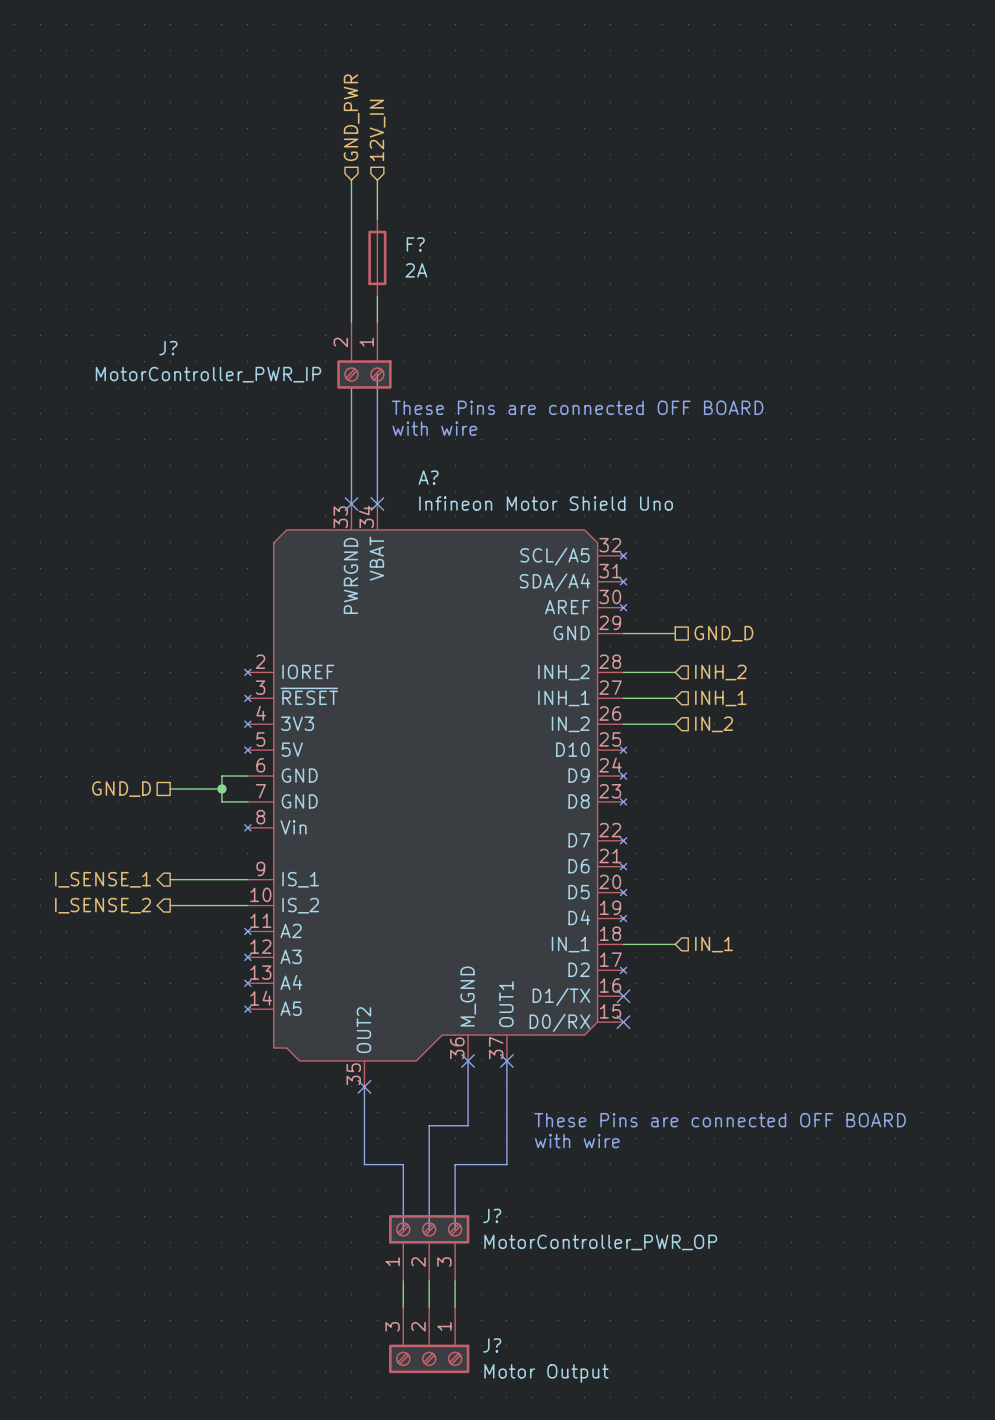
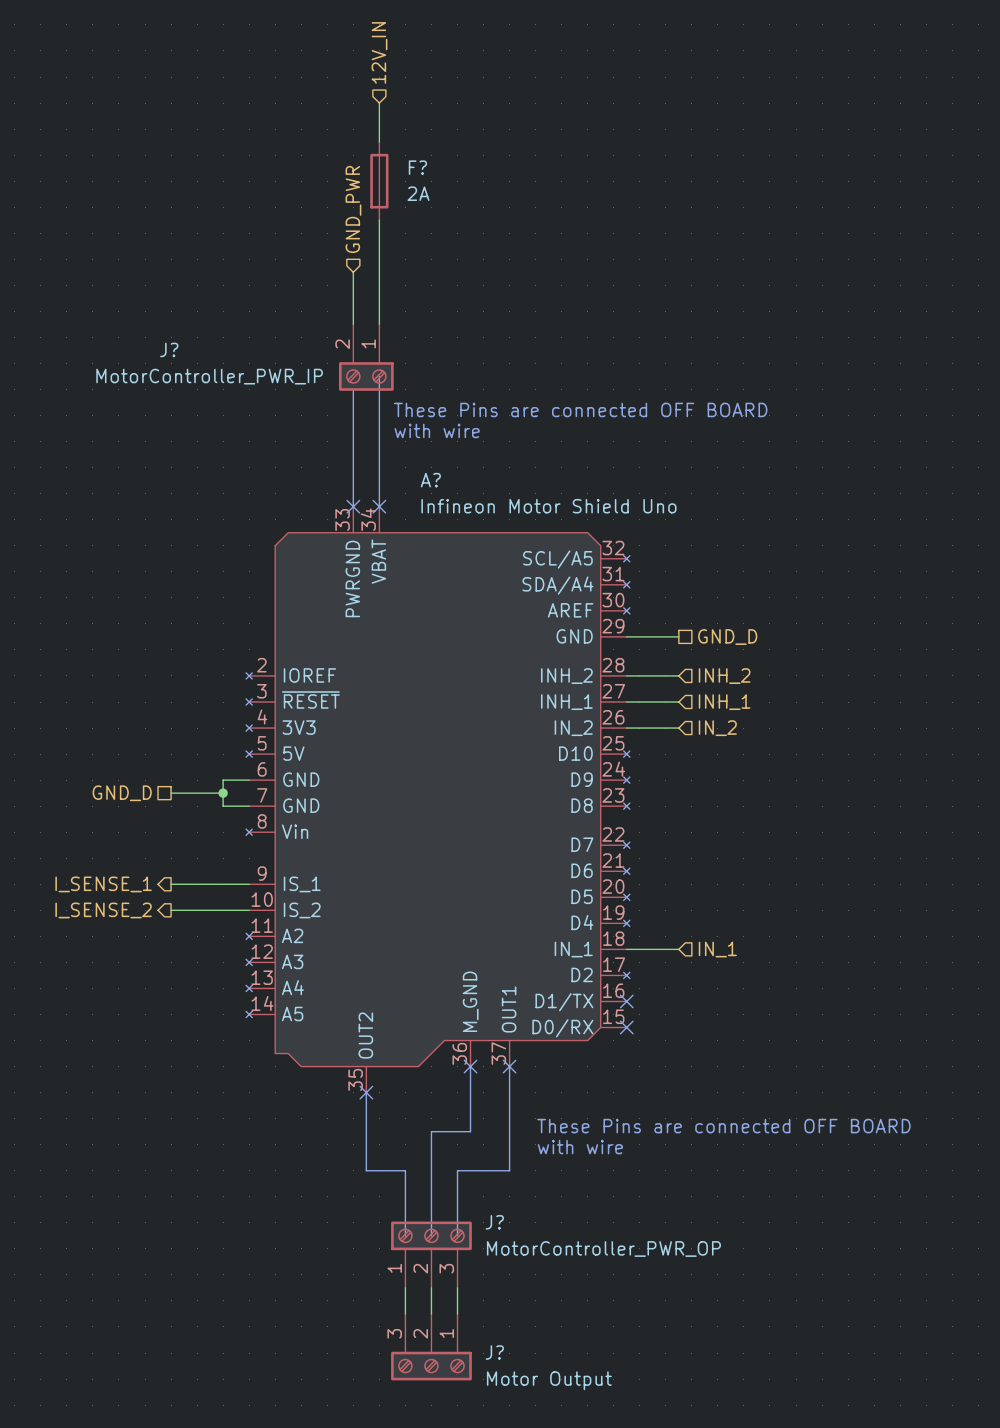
wire: none -> (379, 103) (379, 142)
hierarchical label position: GND_PWR (351, 117) -> GND_PWR (353, 209)
hierarchical label position: 12V_IN (377, 130) -> 12V_IN (379, 52)
wire: (351, 180) (351, 270) -> none
F? position: (377, 257) -> (379, 181)

